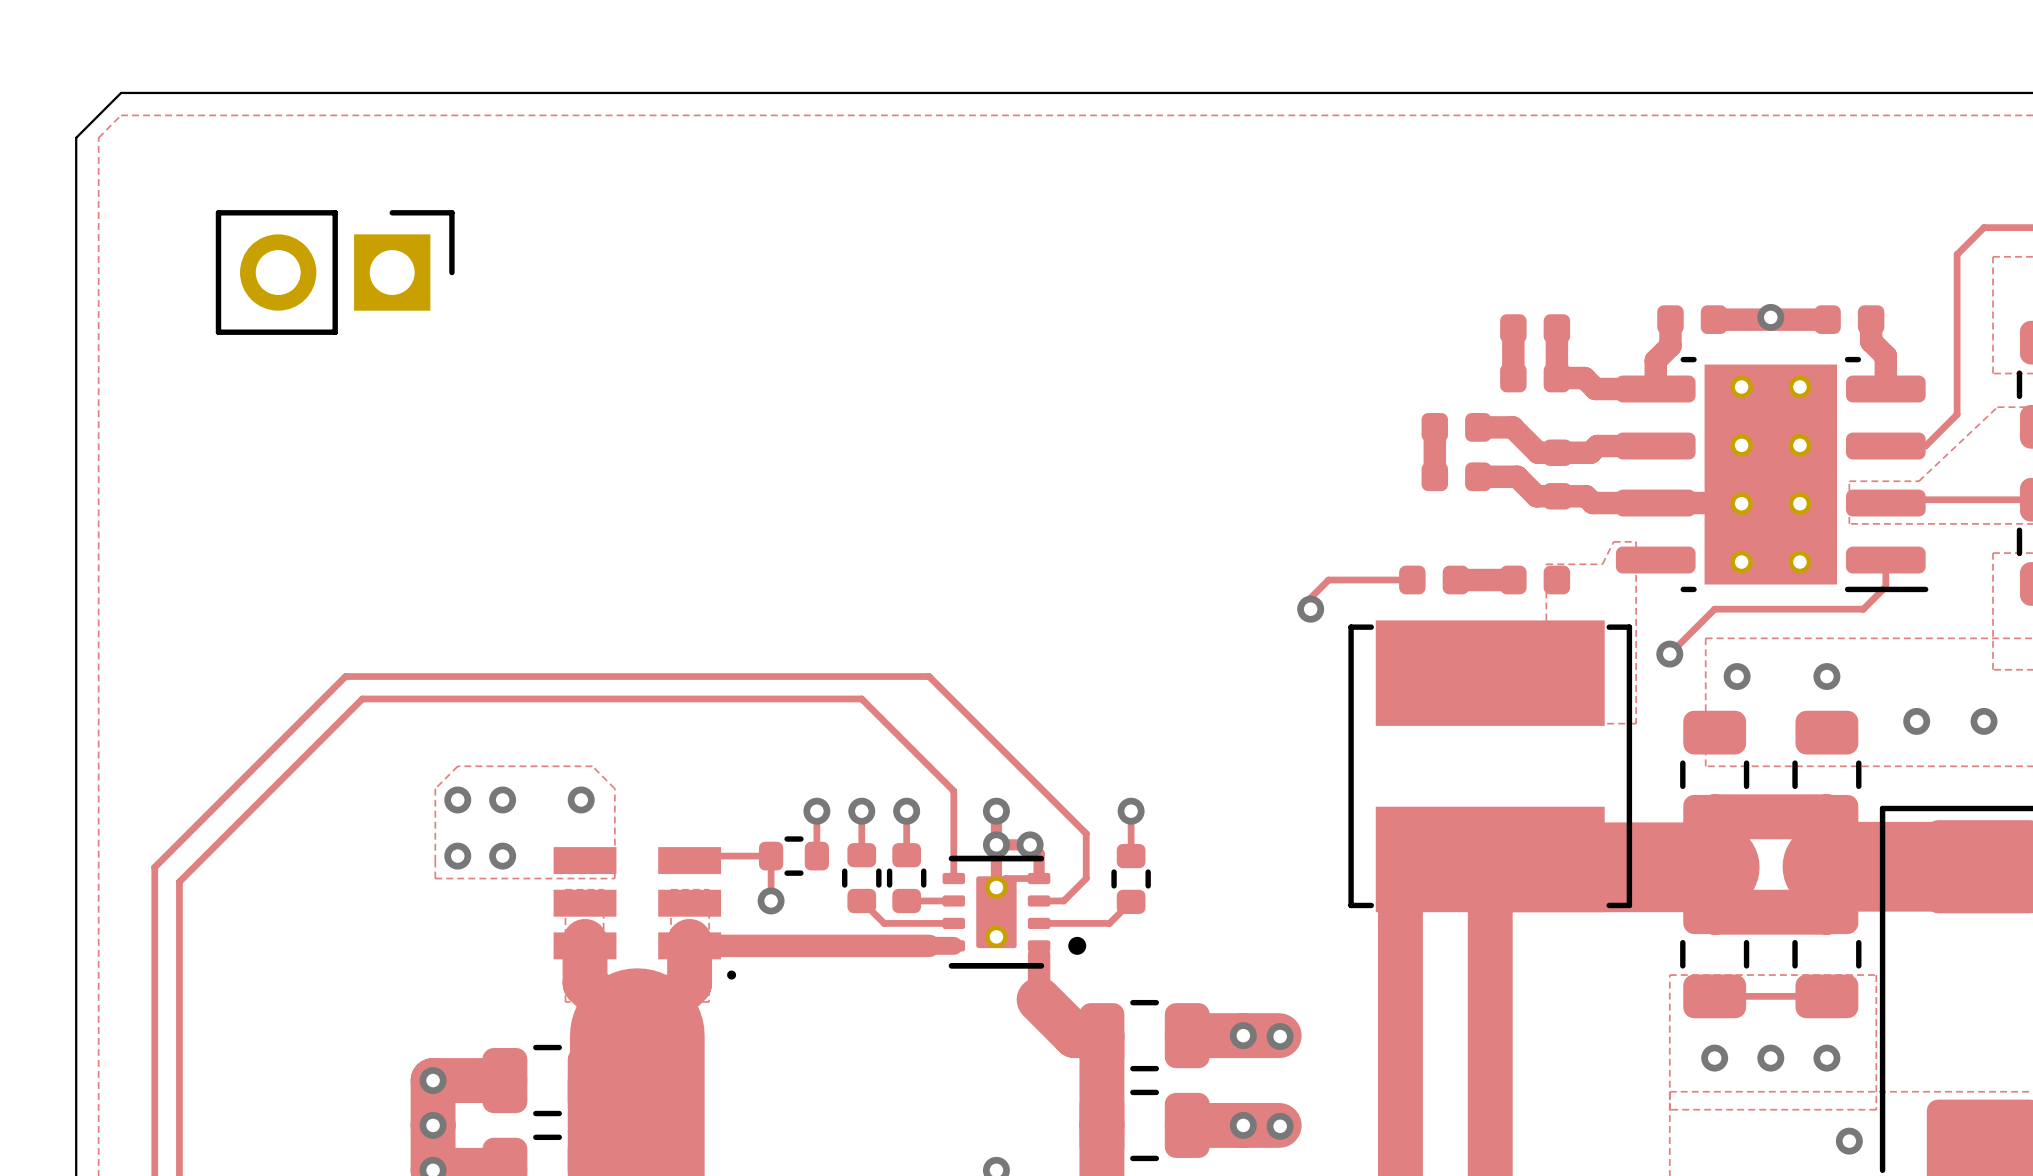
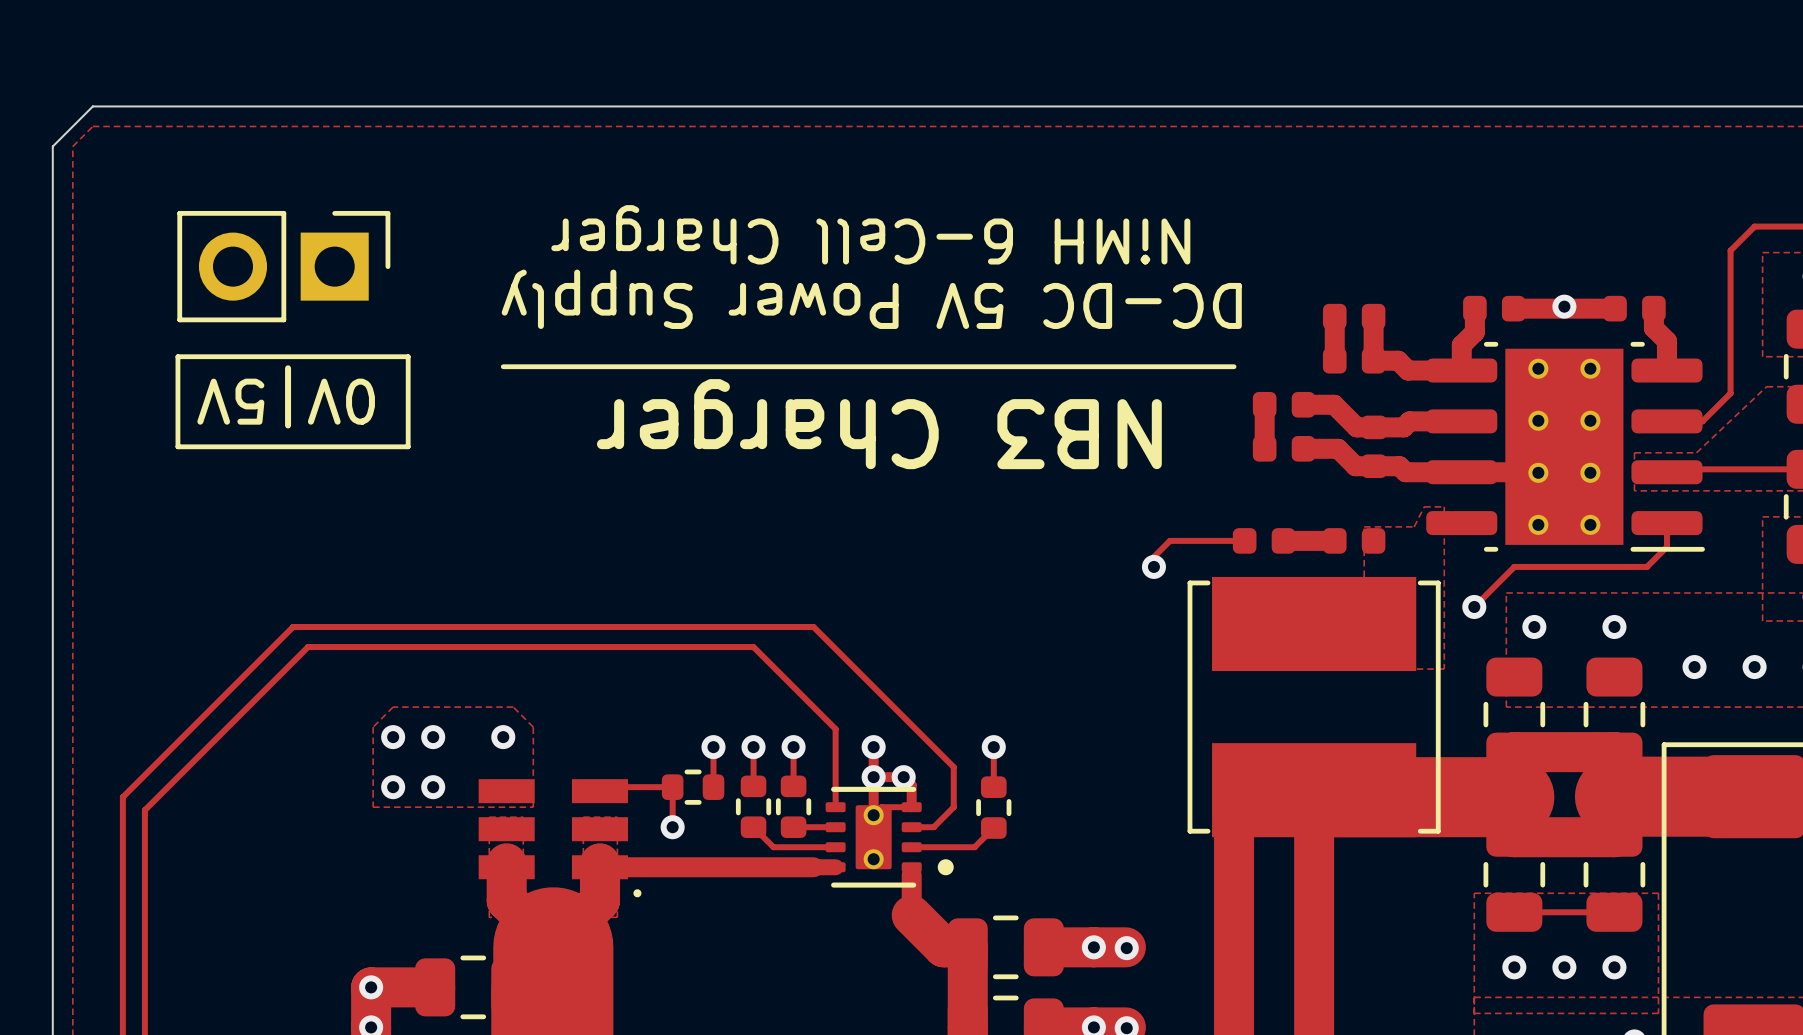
text: none -> NiMH 6-Cell Charger (870, 234)
text: none -> DC-DC 5V Power Supply (871, 299)
line: none -> (177, 356) (408, 356) (408, 446) (177, 446) (177, 356)
line: none -> (503, 366) (1234, 366)
text: none -> 0V|5V (286, 396)
text: none -> NB3 Charger (879, 424)

